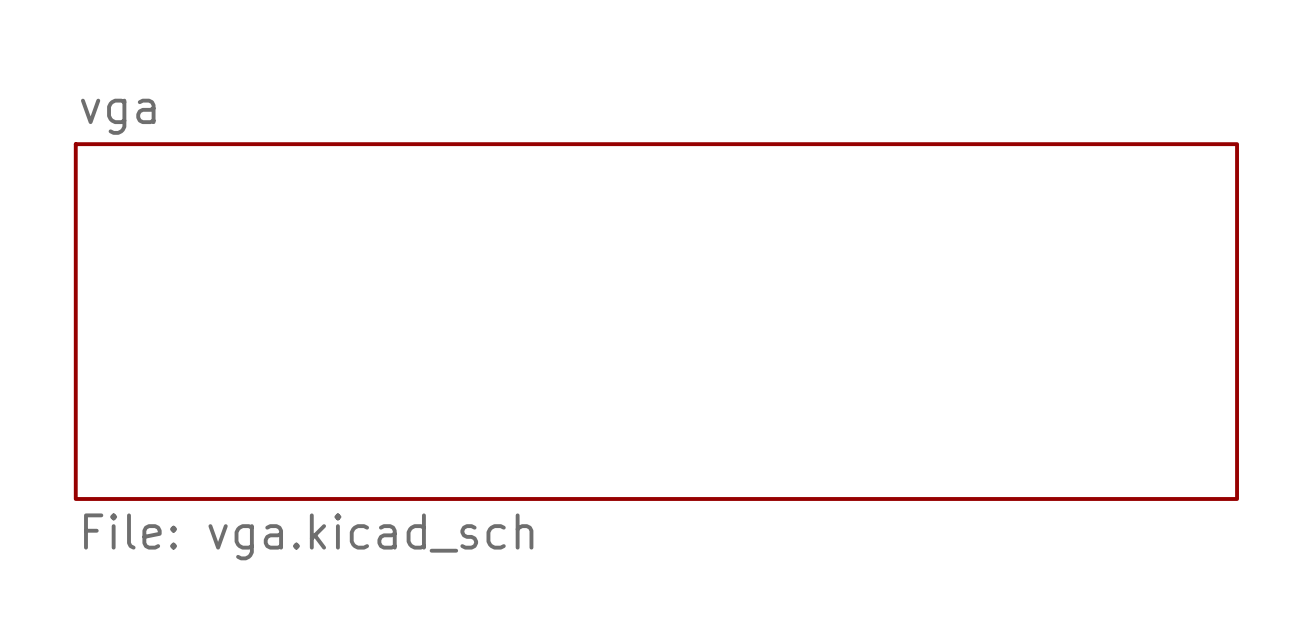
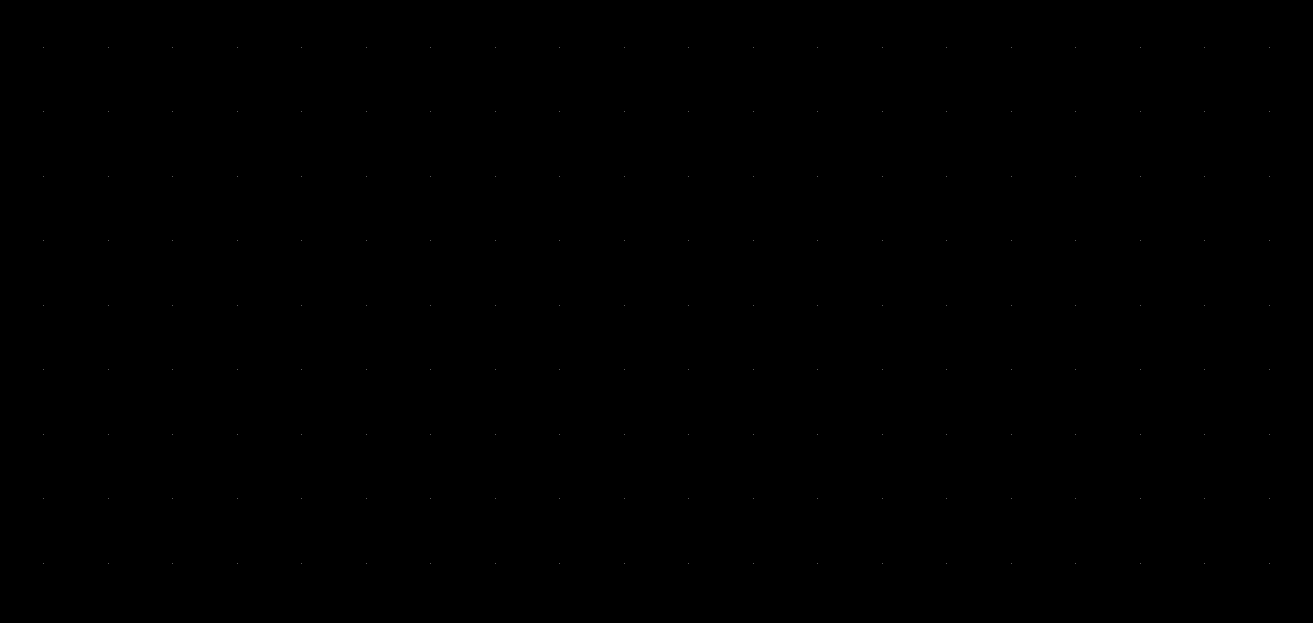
sheet vga: File: vga.kicad_sch (656, 321) -> none

